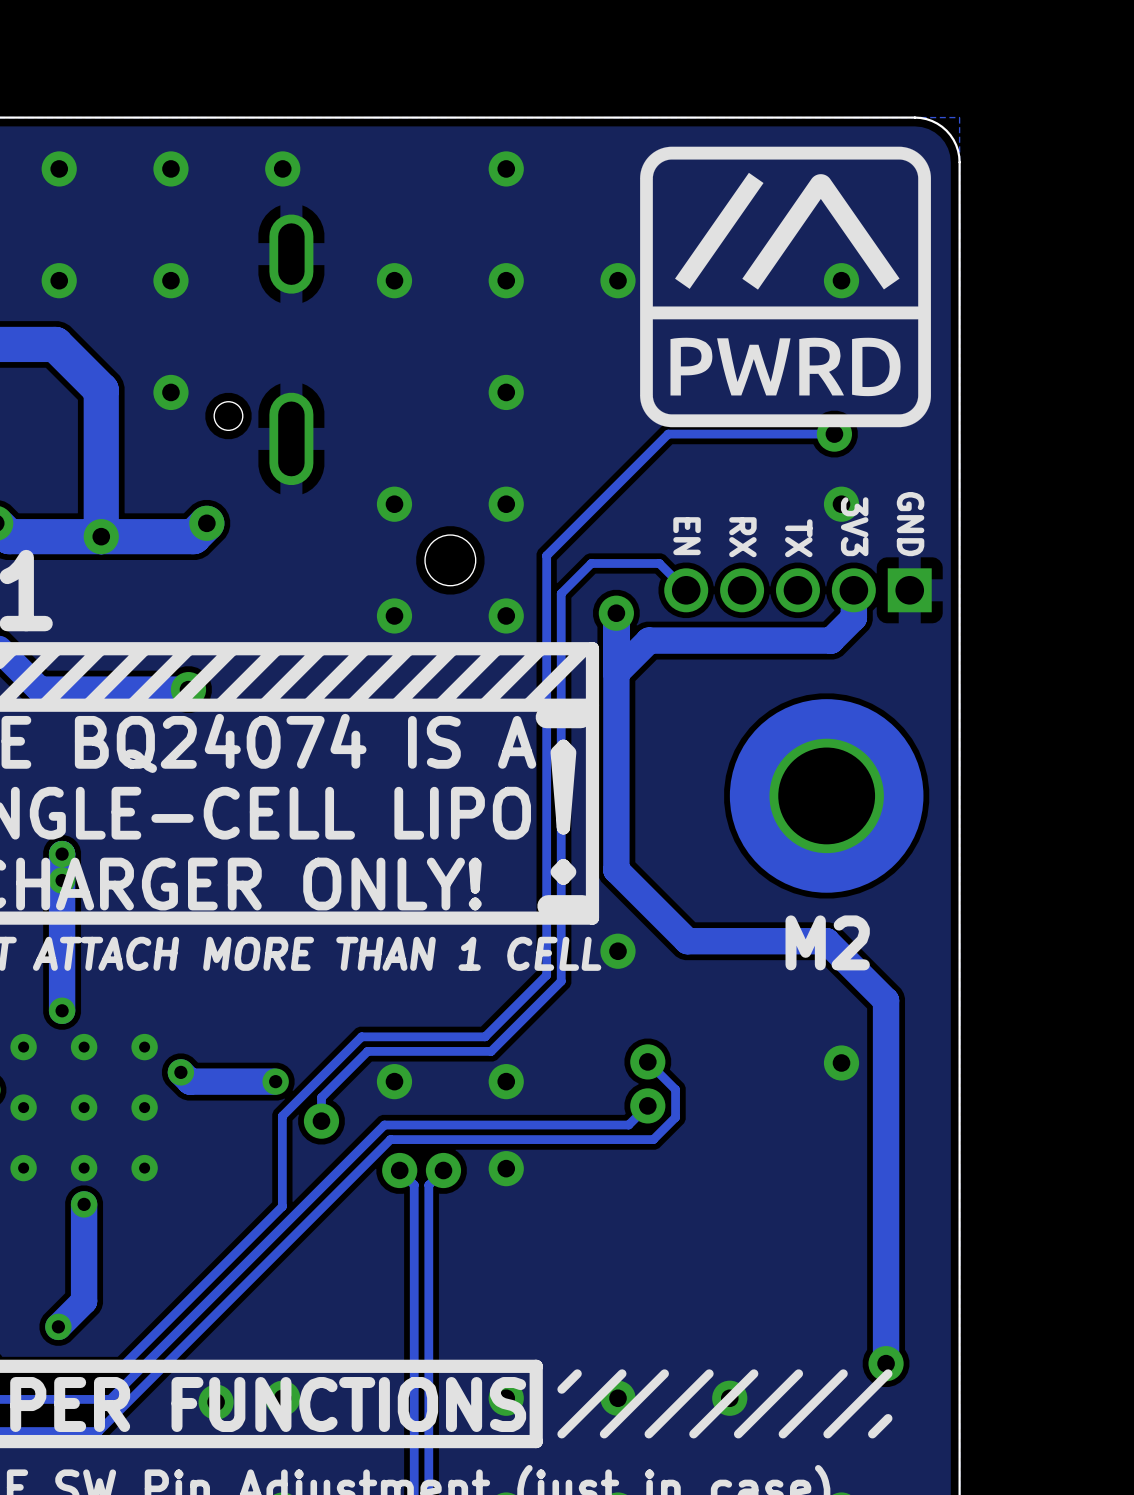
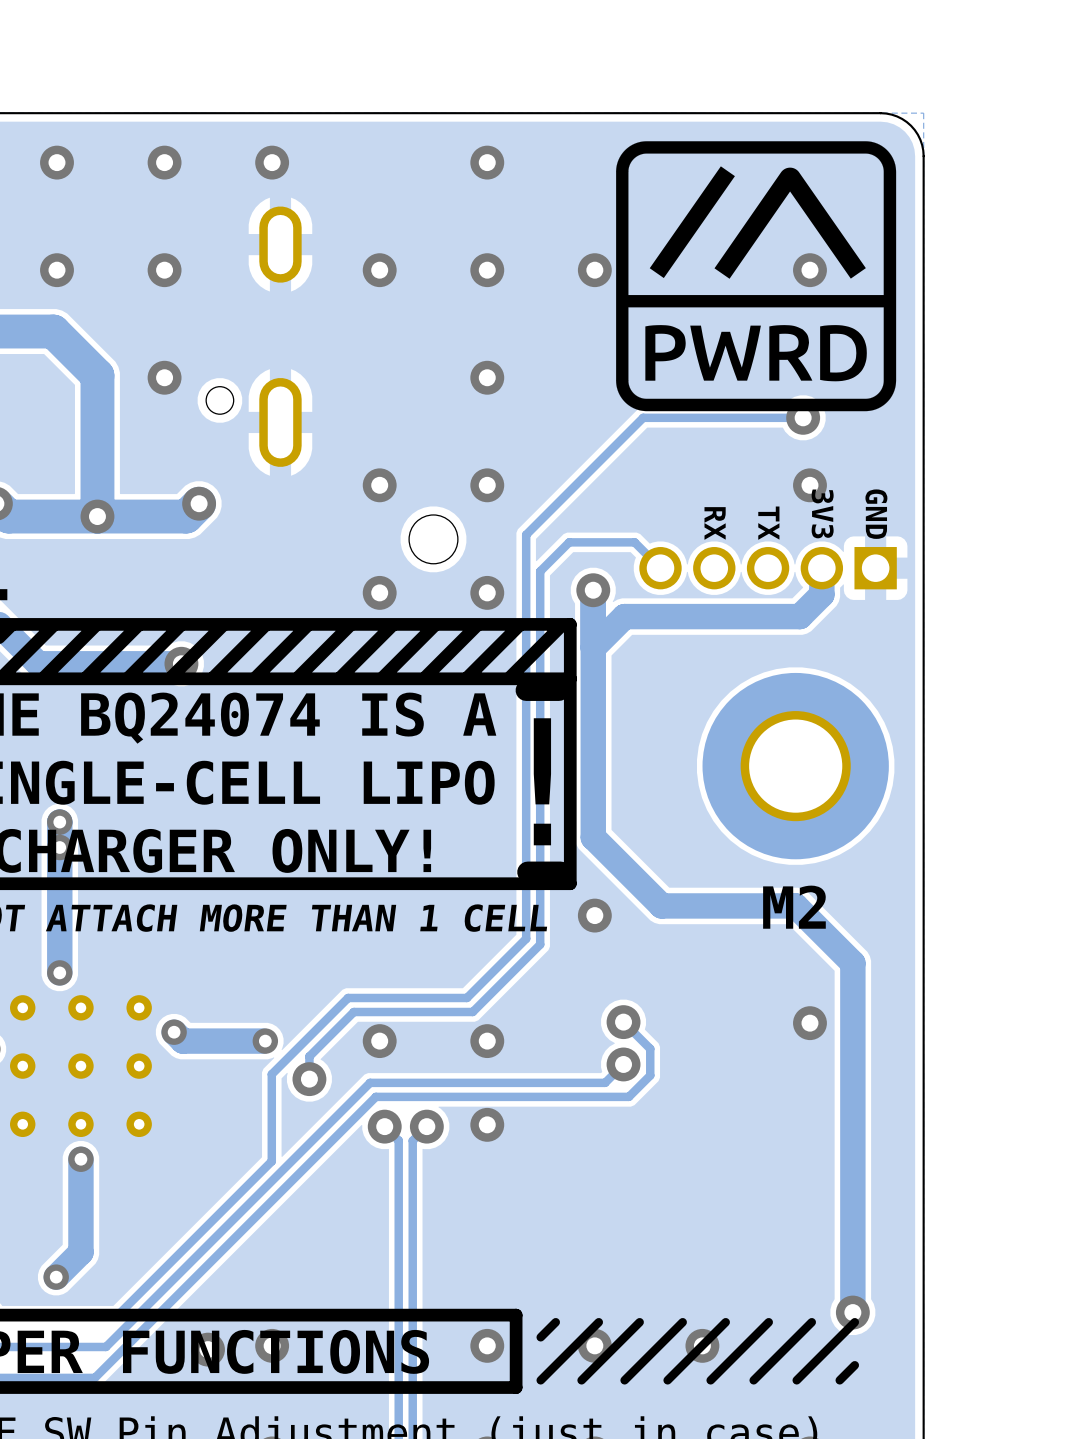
text: EN (687, 536) -> none

